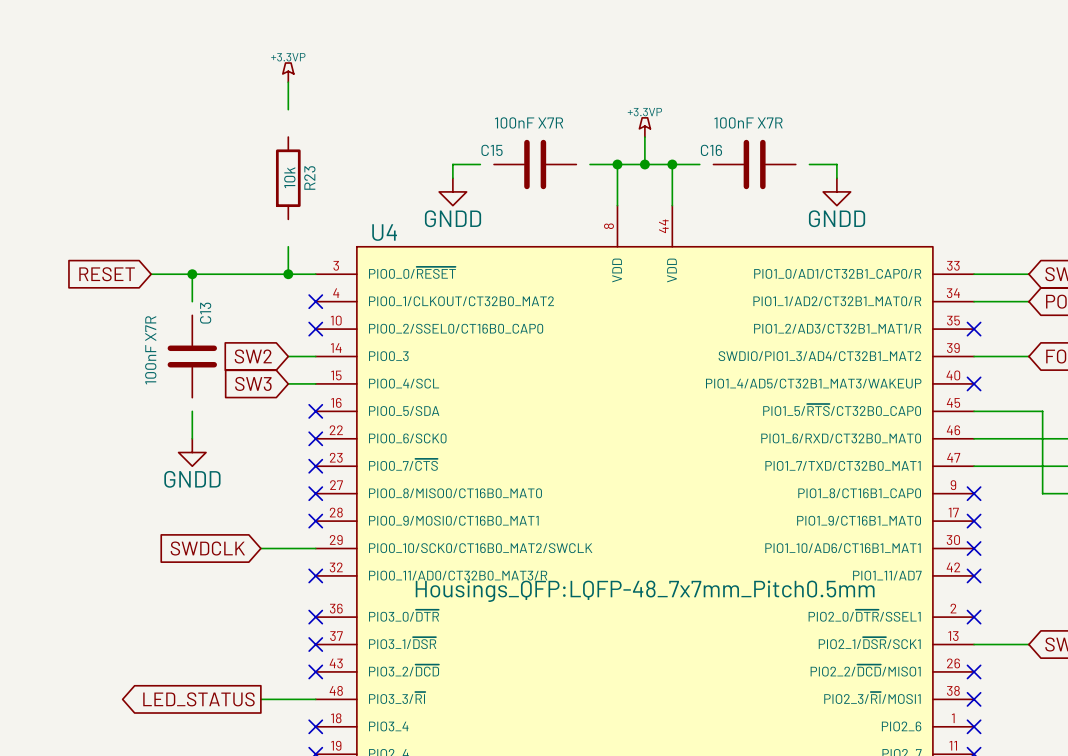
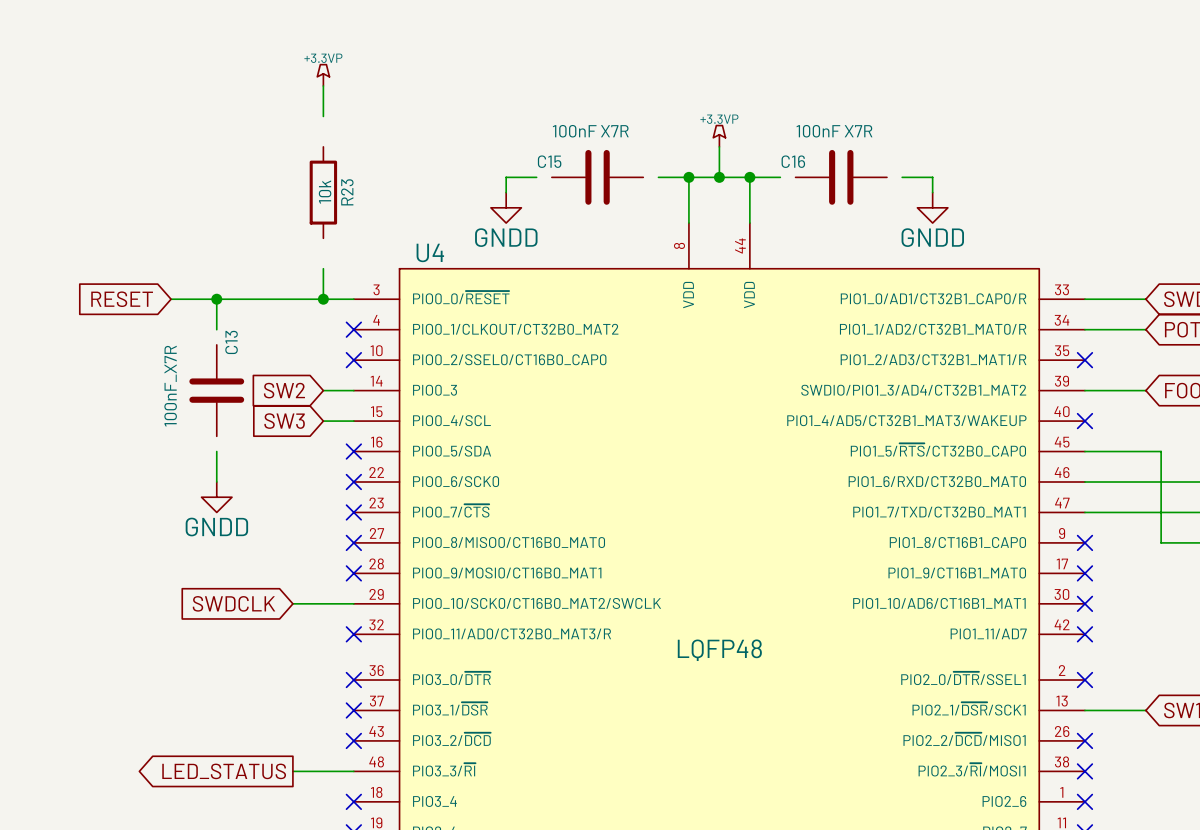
C13 value: 100nF X7R (150, 350) -> 100nF_X7R (170, 386)
U4 text: Housings_QFP:LQFP-48_7x7mm_Pitch0.5mm (645, 591) -> LQFP48 (719, 650)

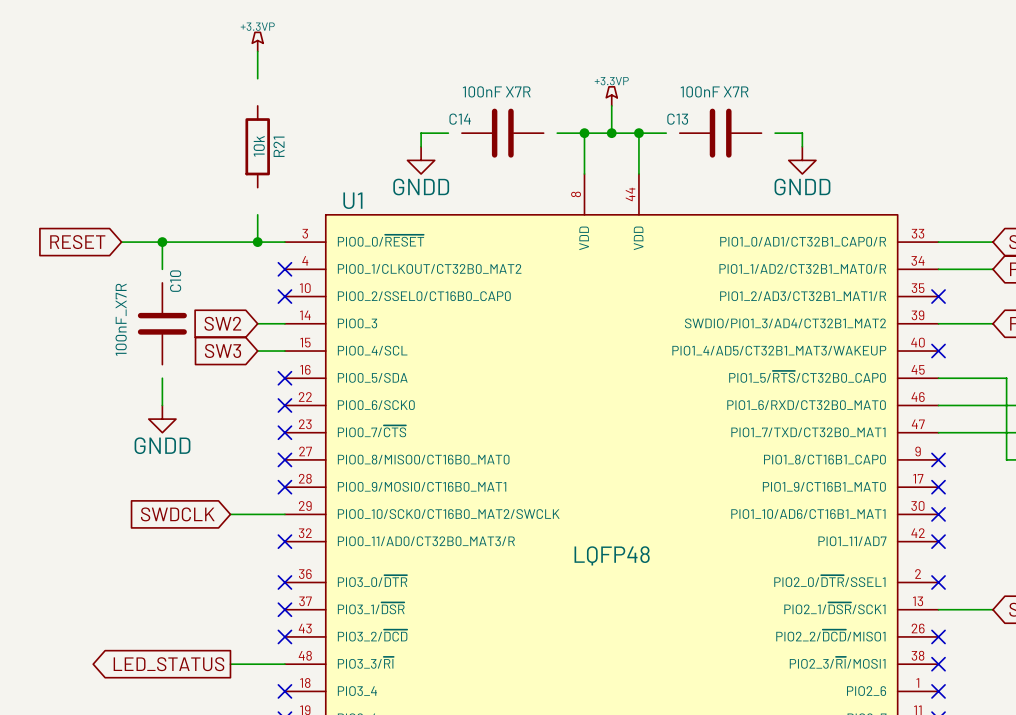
C15 name: C15 (549, 161) -> C14 (460, 119)
C16 name: C16 (793, 161) -> C13 (677, 119)
R23 name: R23 (347, 192) -> R21 (279, 146)
U4 name: U4 (430, 252) -> U1 (352, 200)
C13 name: C13 (231, 342) -> C10 (175, 281)

